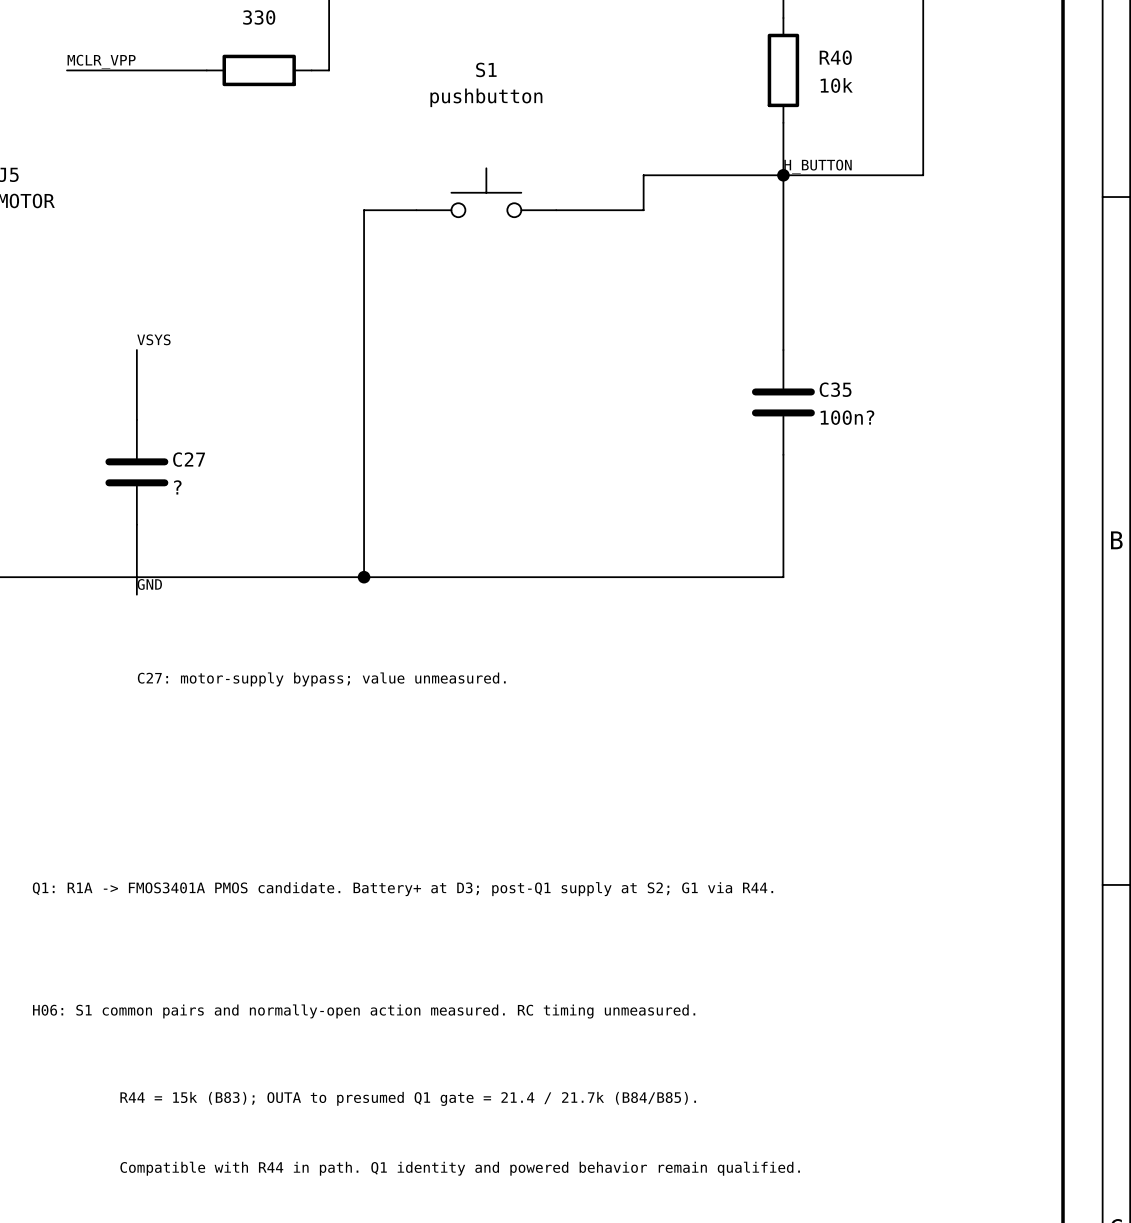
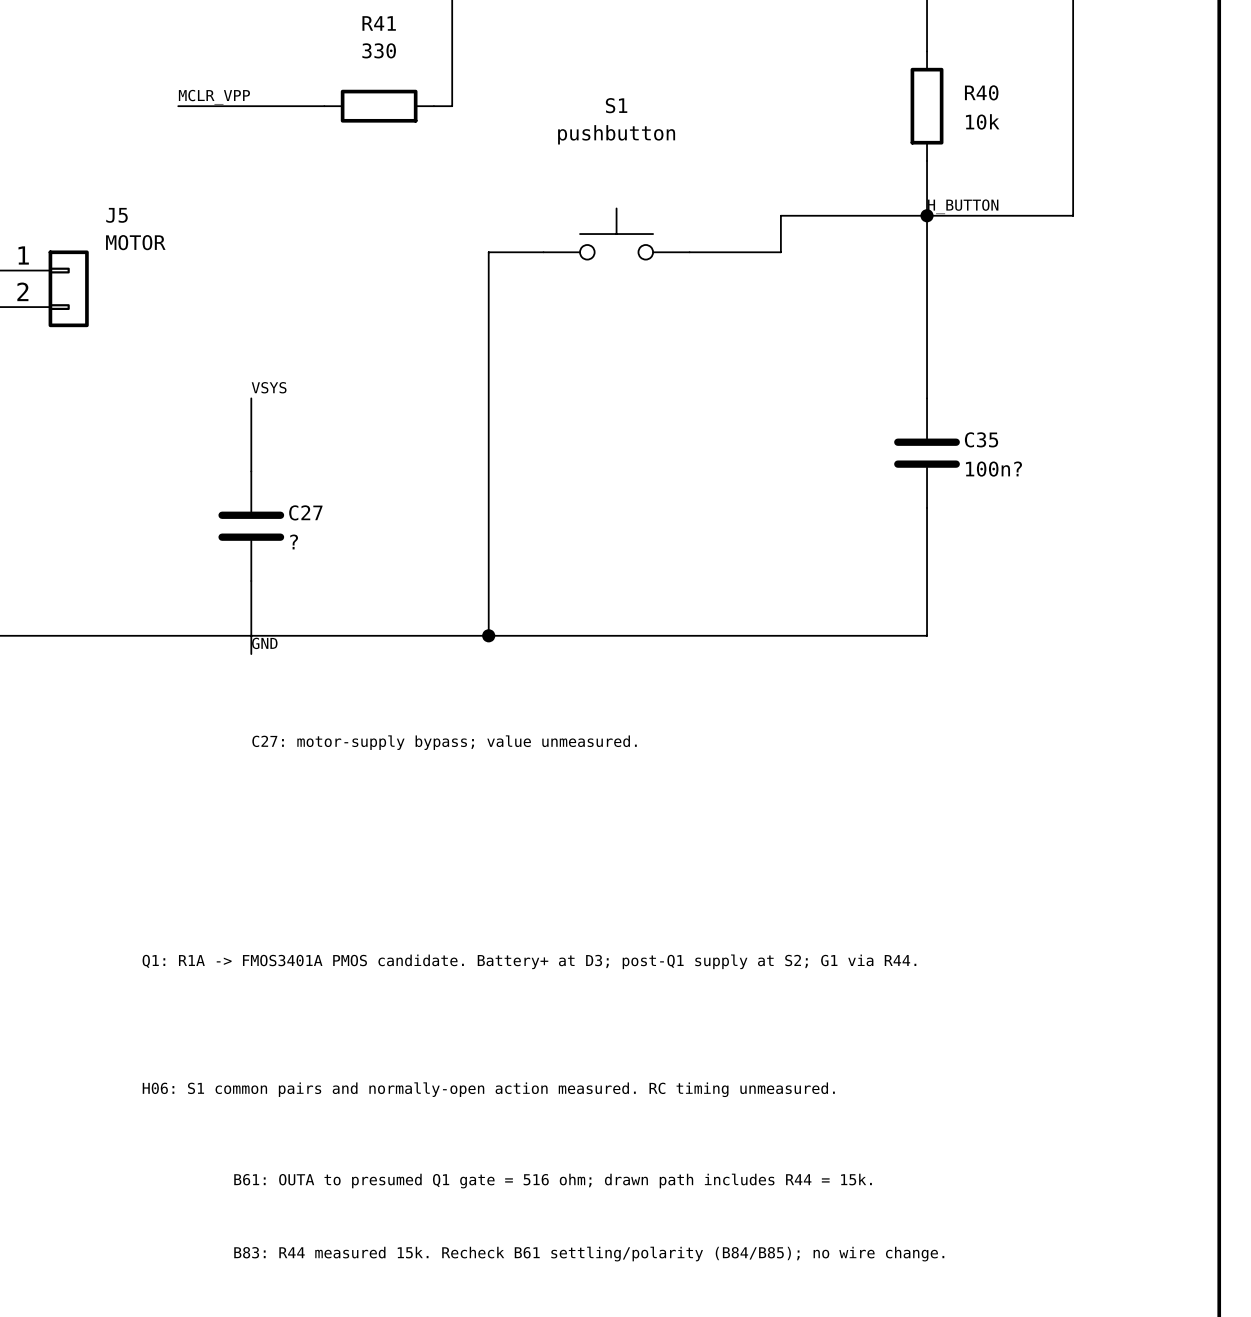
text: R44 = 15k (B83); OUTA to presumed Q1 gate = 21.4 / 21.7k (B84/B85). (408, 1098) -> B61: OUTA to presumed Q1 gate = 516 ohm; drawn path includes R44 = 15k. (553, 1181)
text: Compatible with R44 in path. Q1 identity and powered behavior remain qualified. (460, 1168) -> B83: R44 measured 15k. Recheck B61 settling/polarity (B84/B85); no wire change. (589, 1254)

